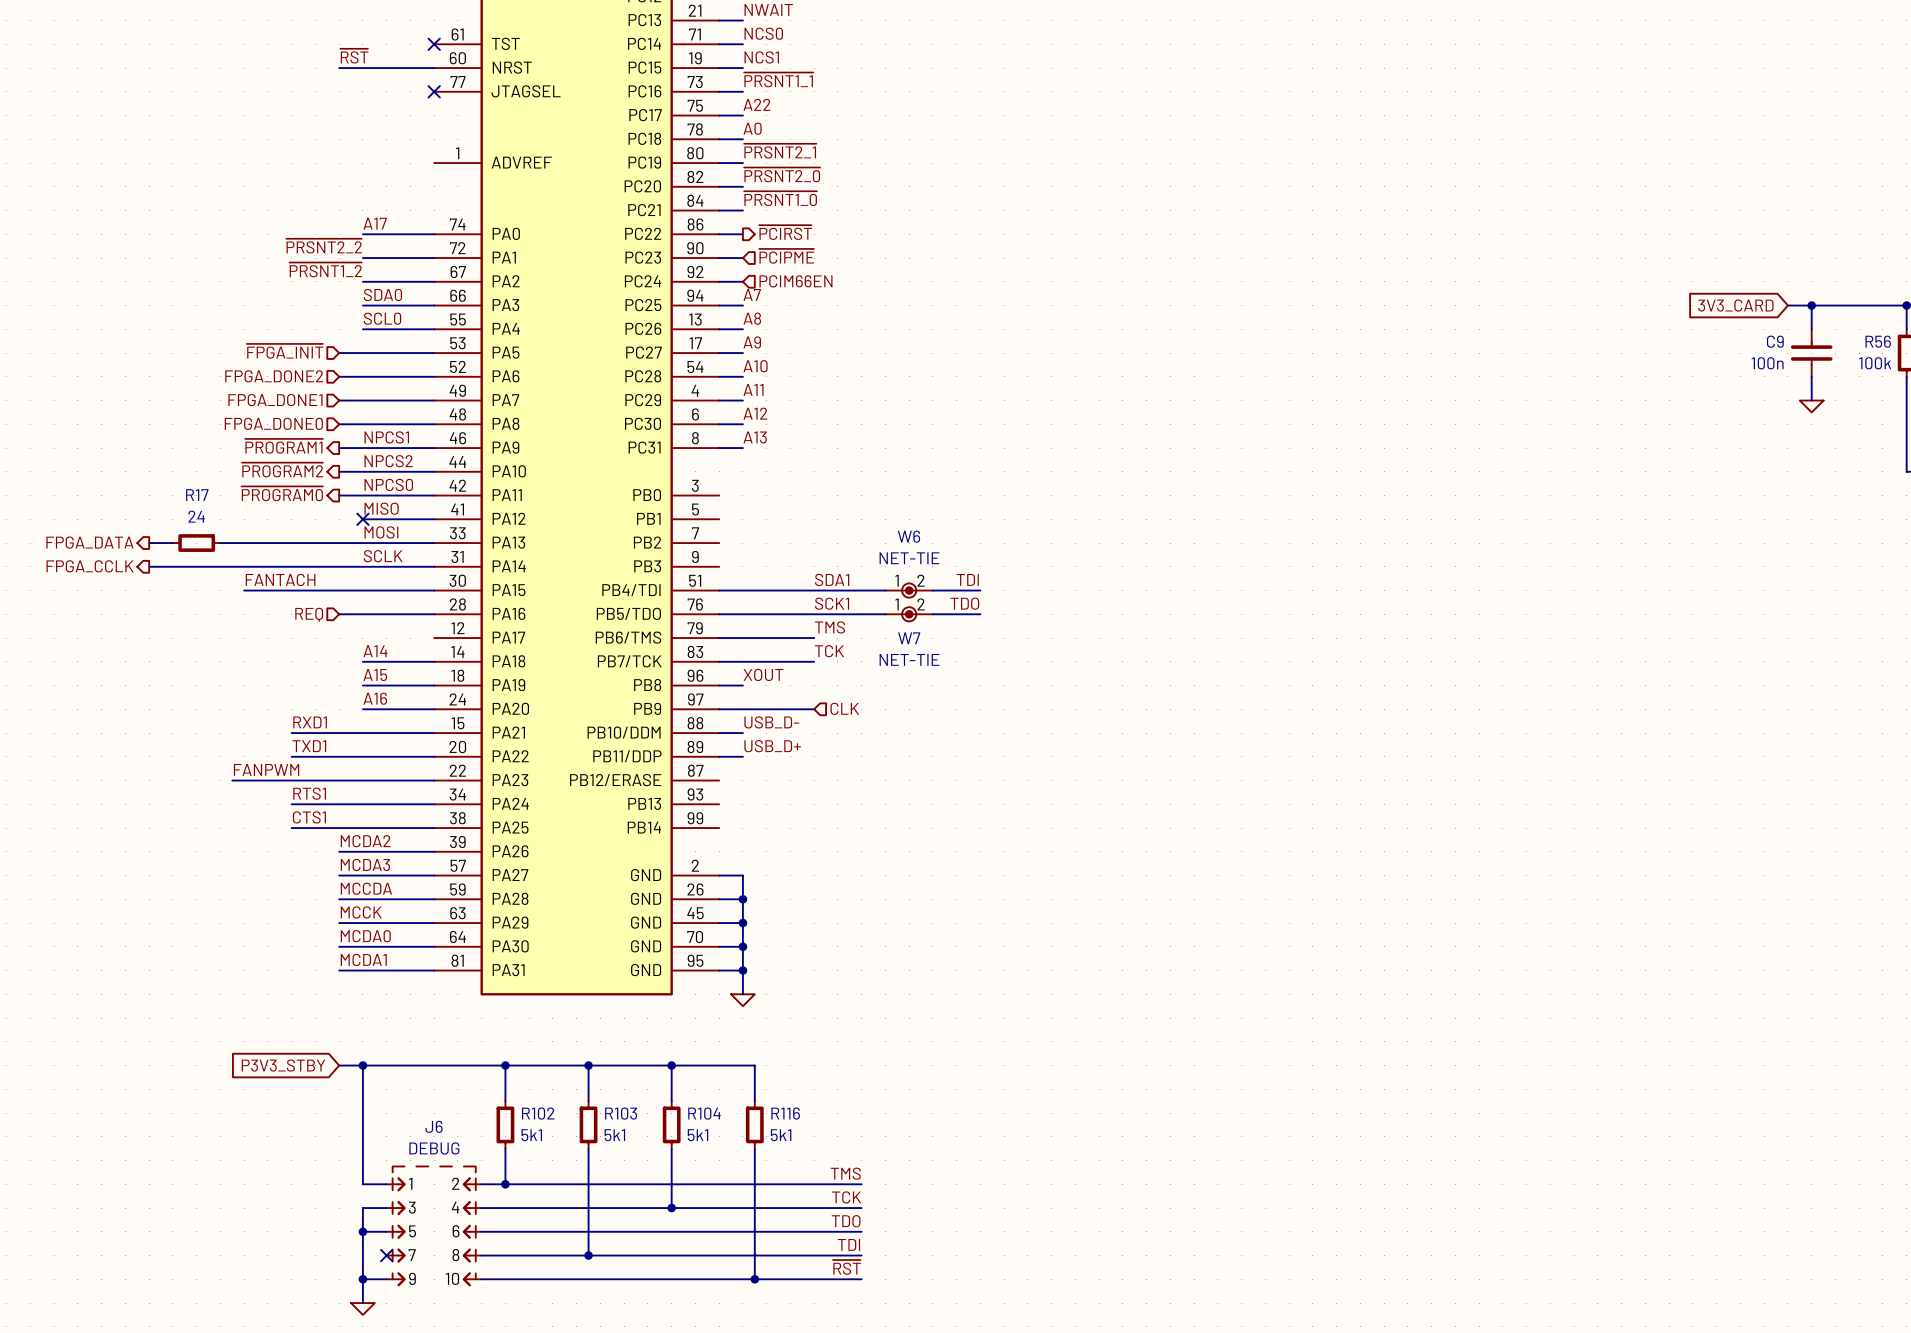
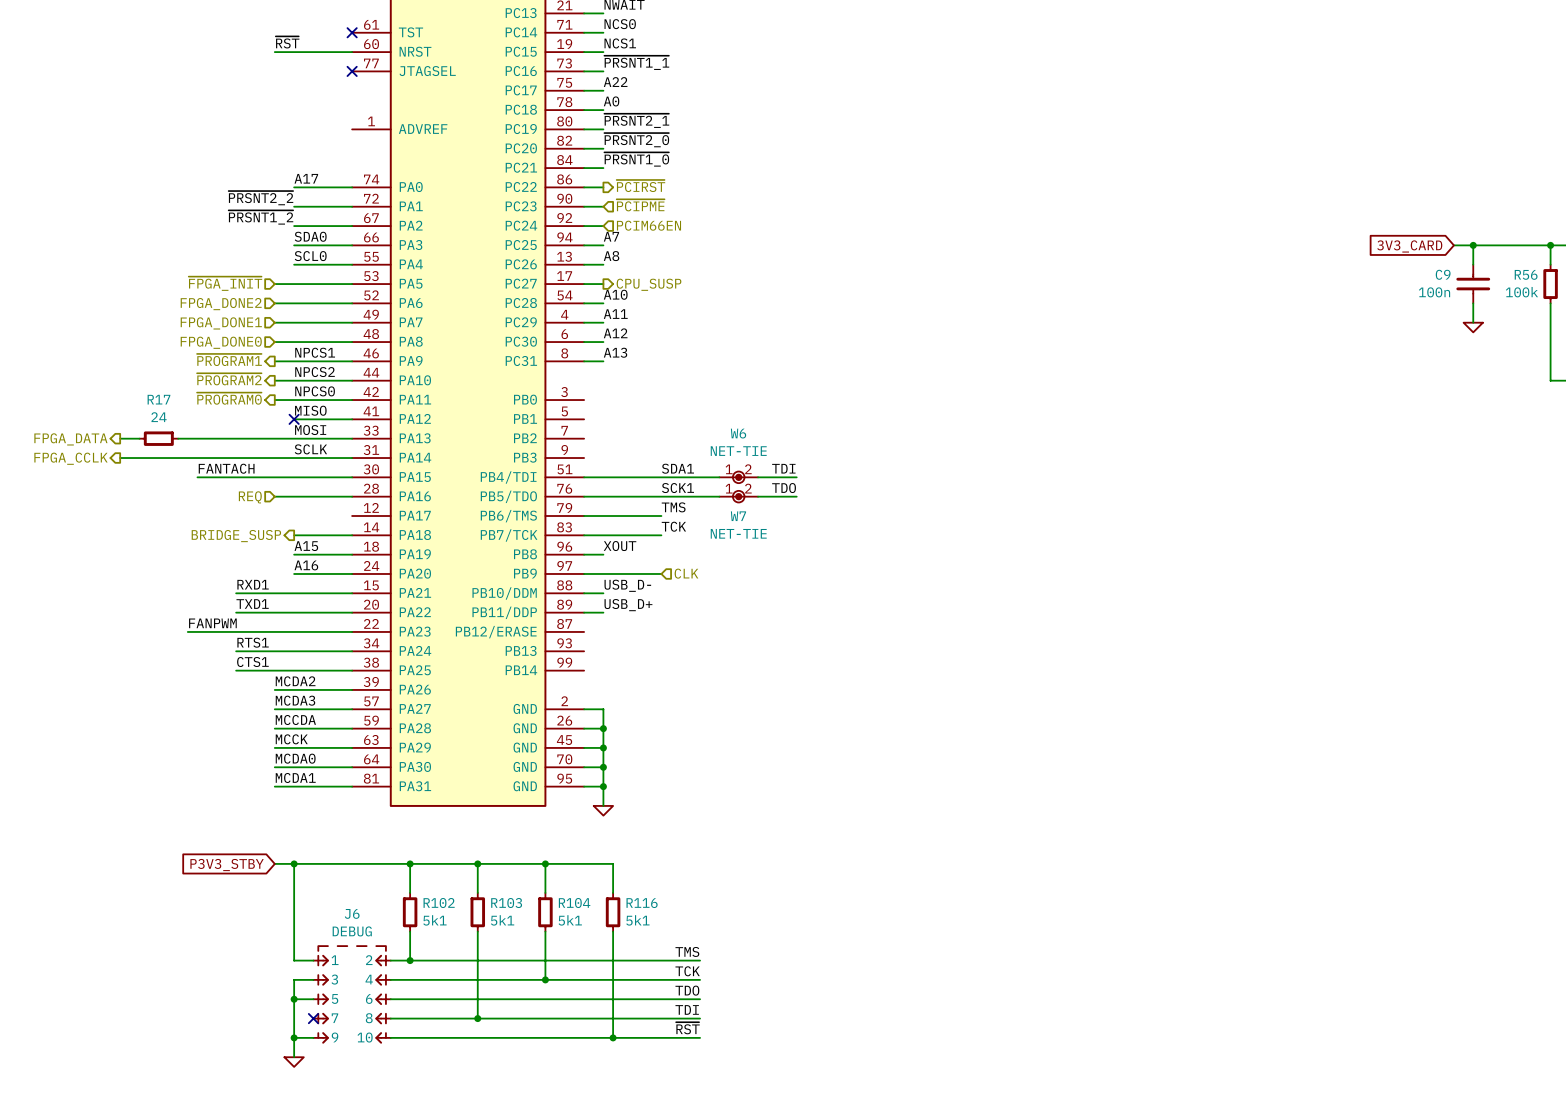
label: A9 (752, 342) -> none
hierarchical label: none -> CPU_SUSP (649, 284)
label: A14 (375, 651) -> none
hierarchical label: none -> BRIDGE_SUSP (236, 536)

